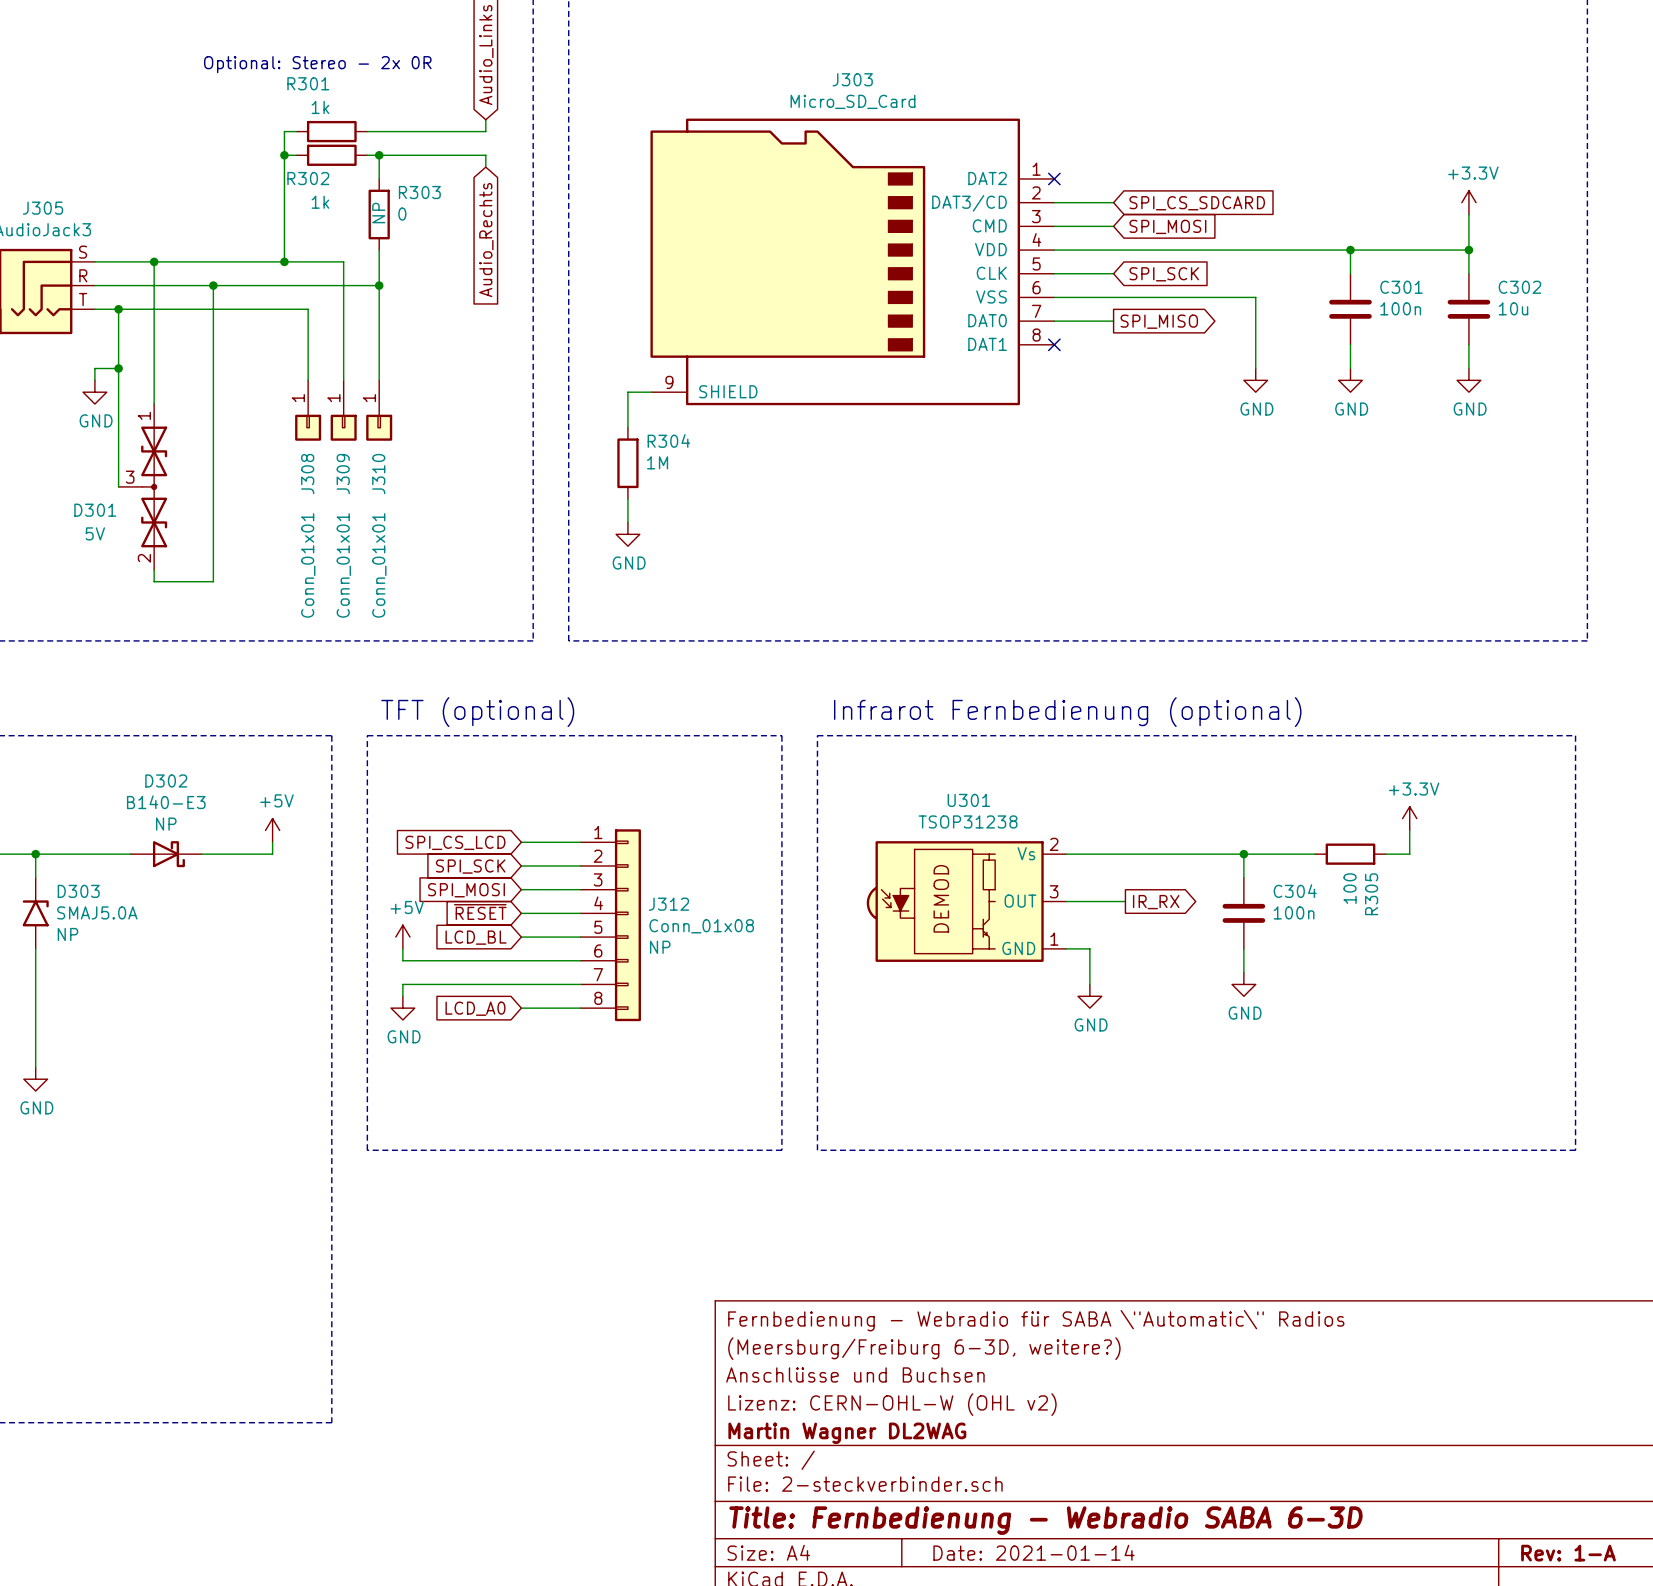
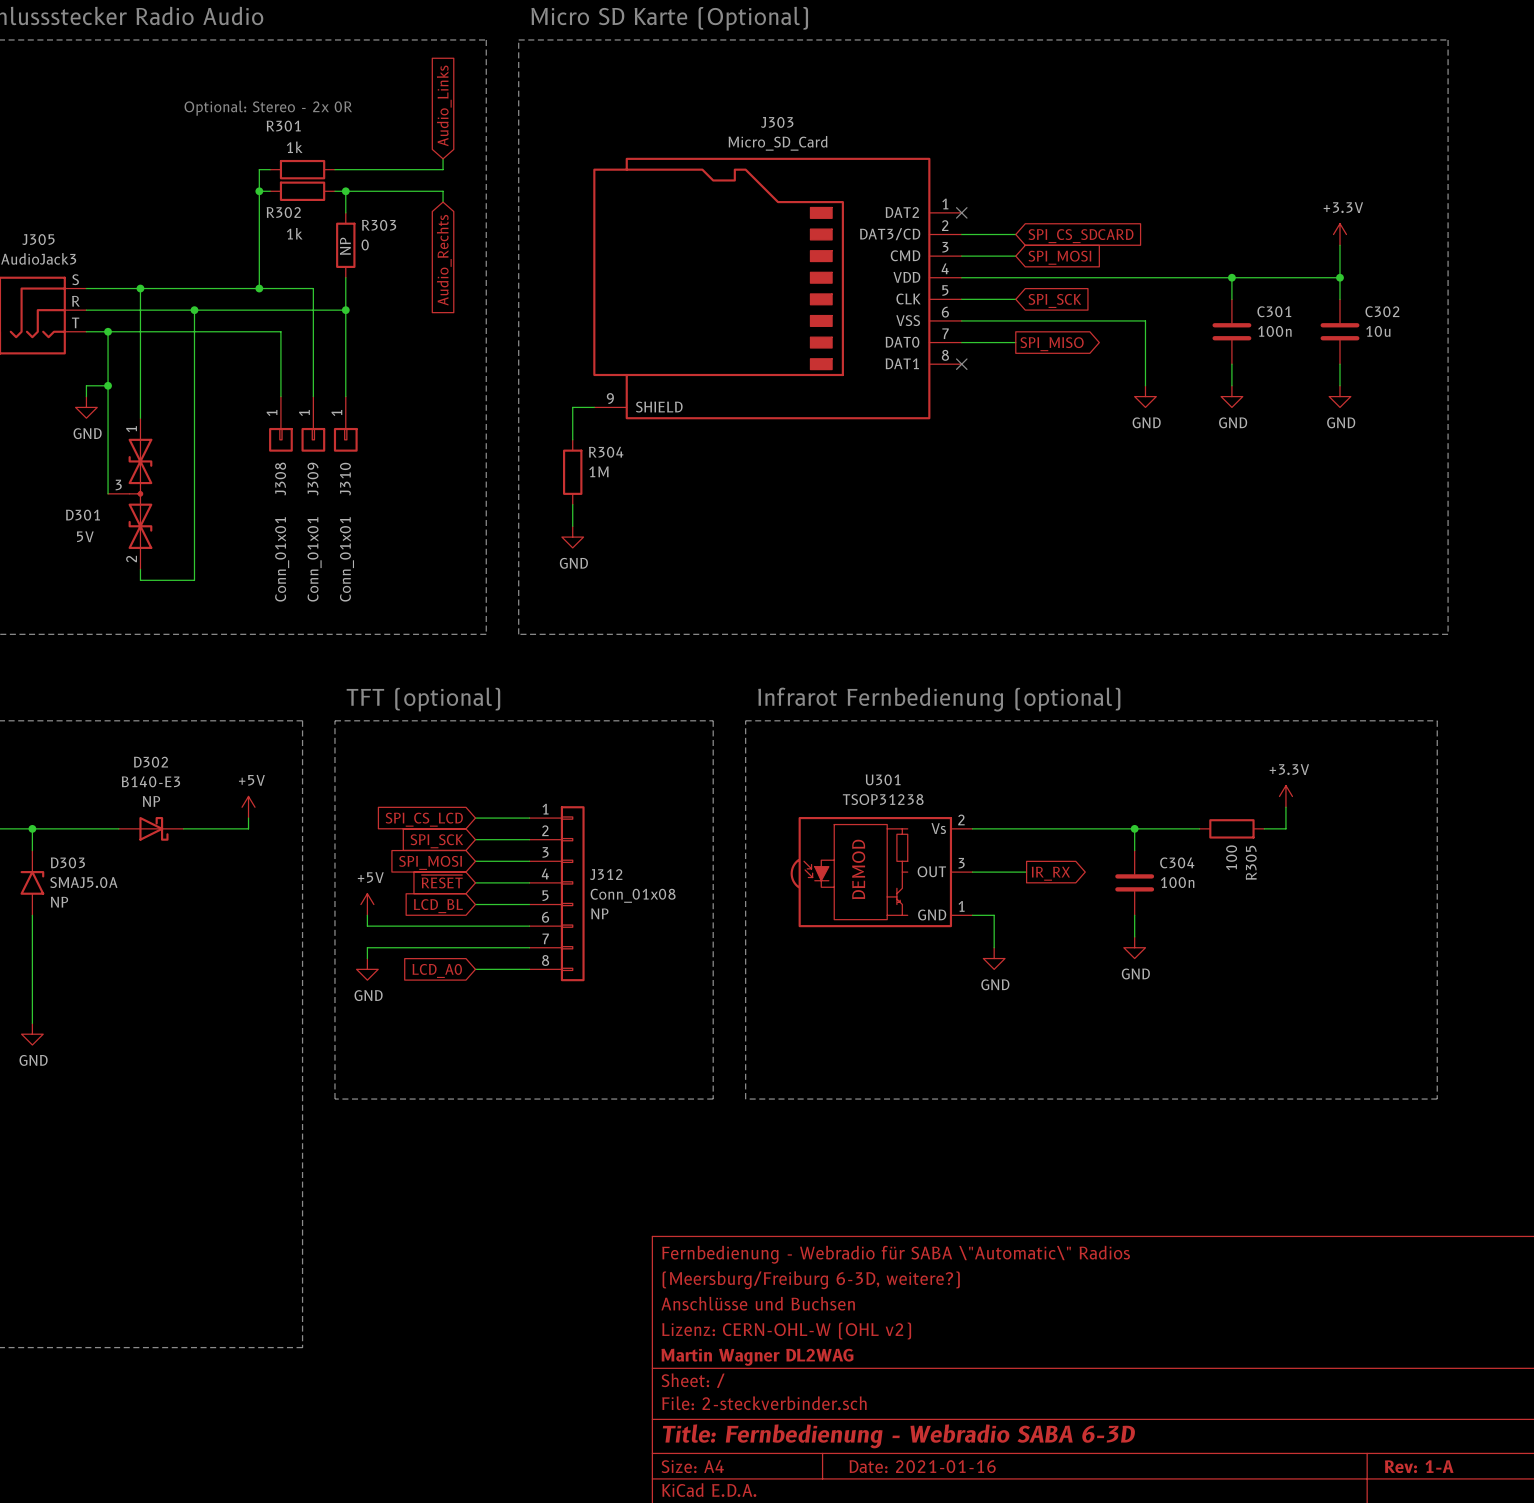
title block: Date: 2021-01-14 (1033, 1552) -> Date: 2021-01-16 (922, 1466)

